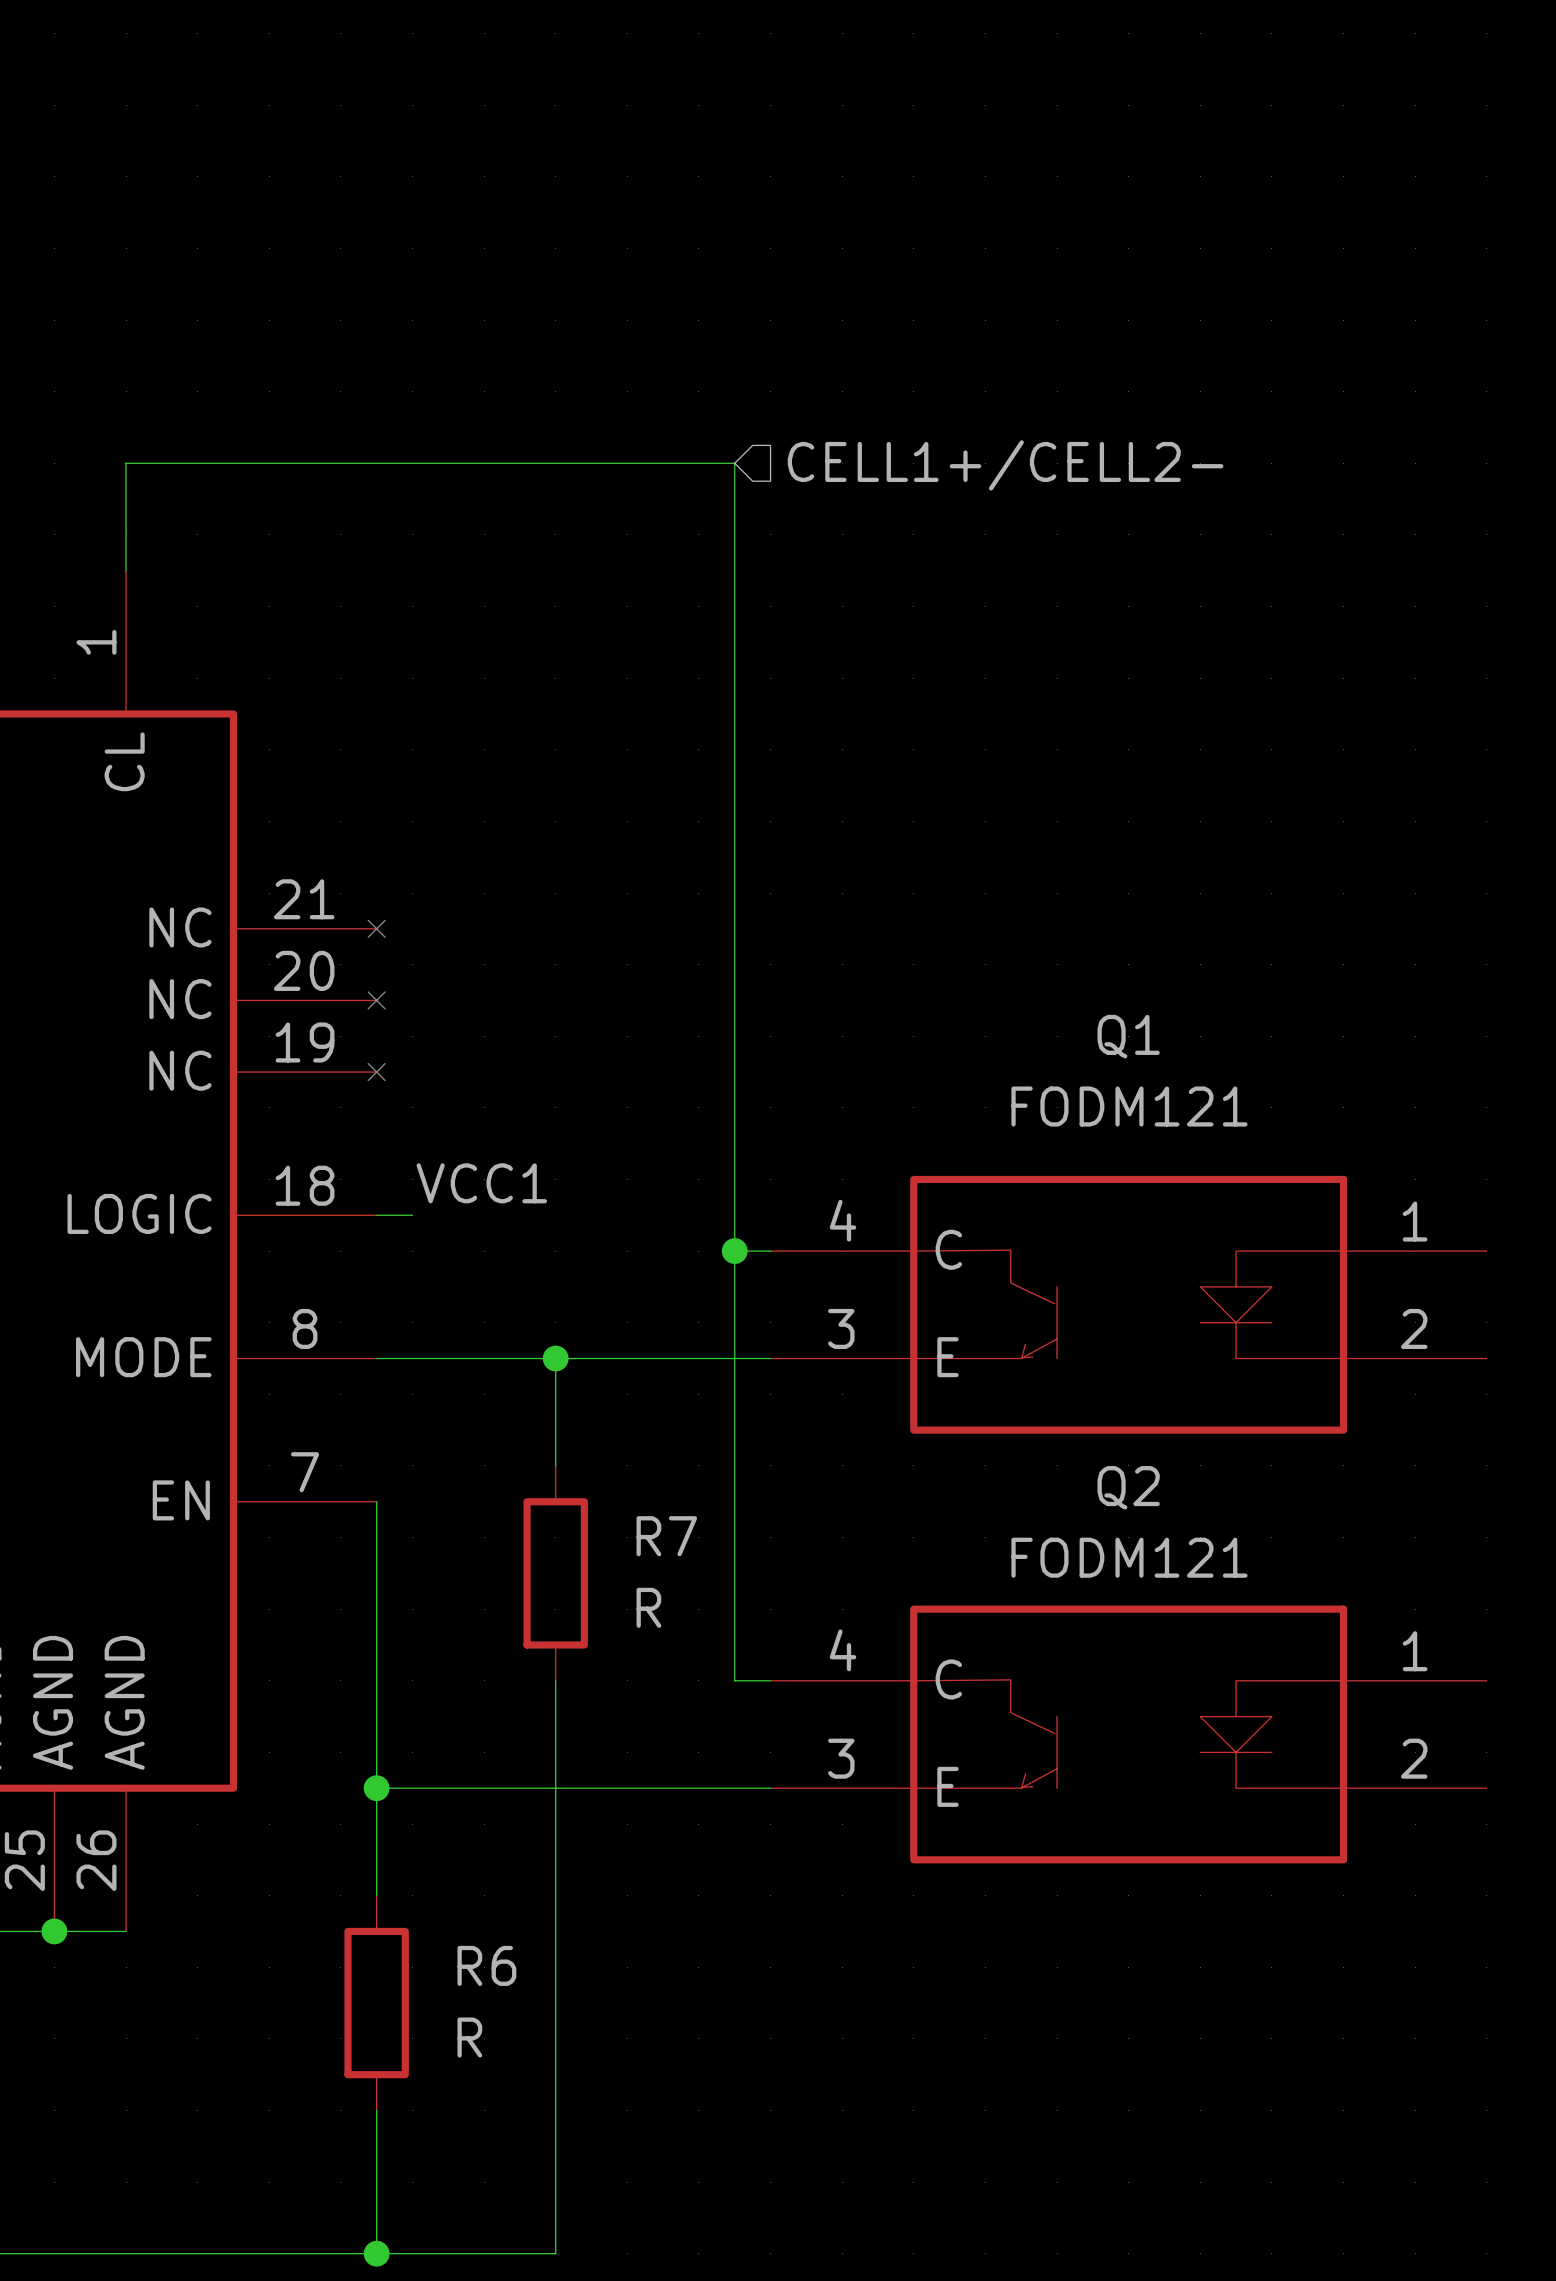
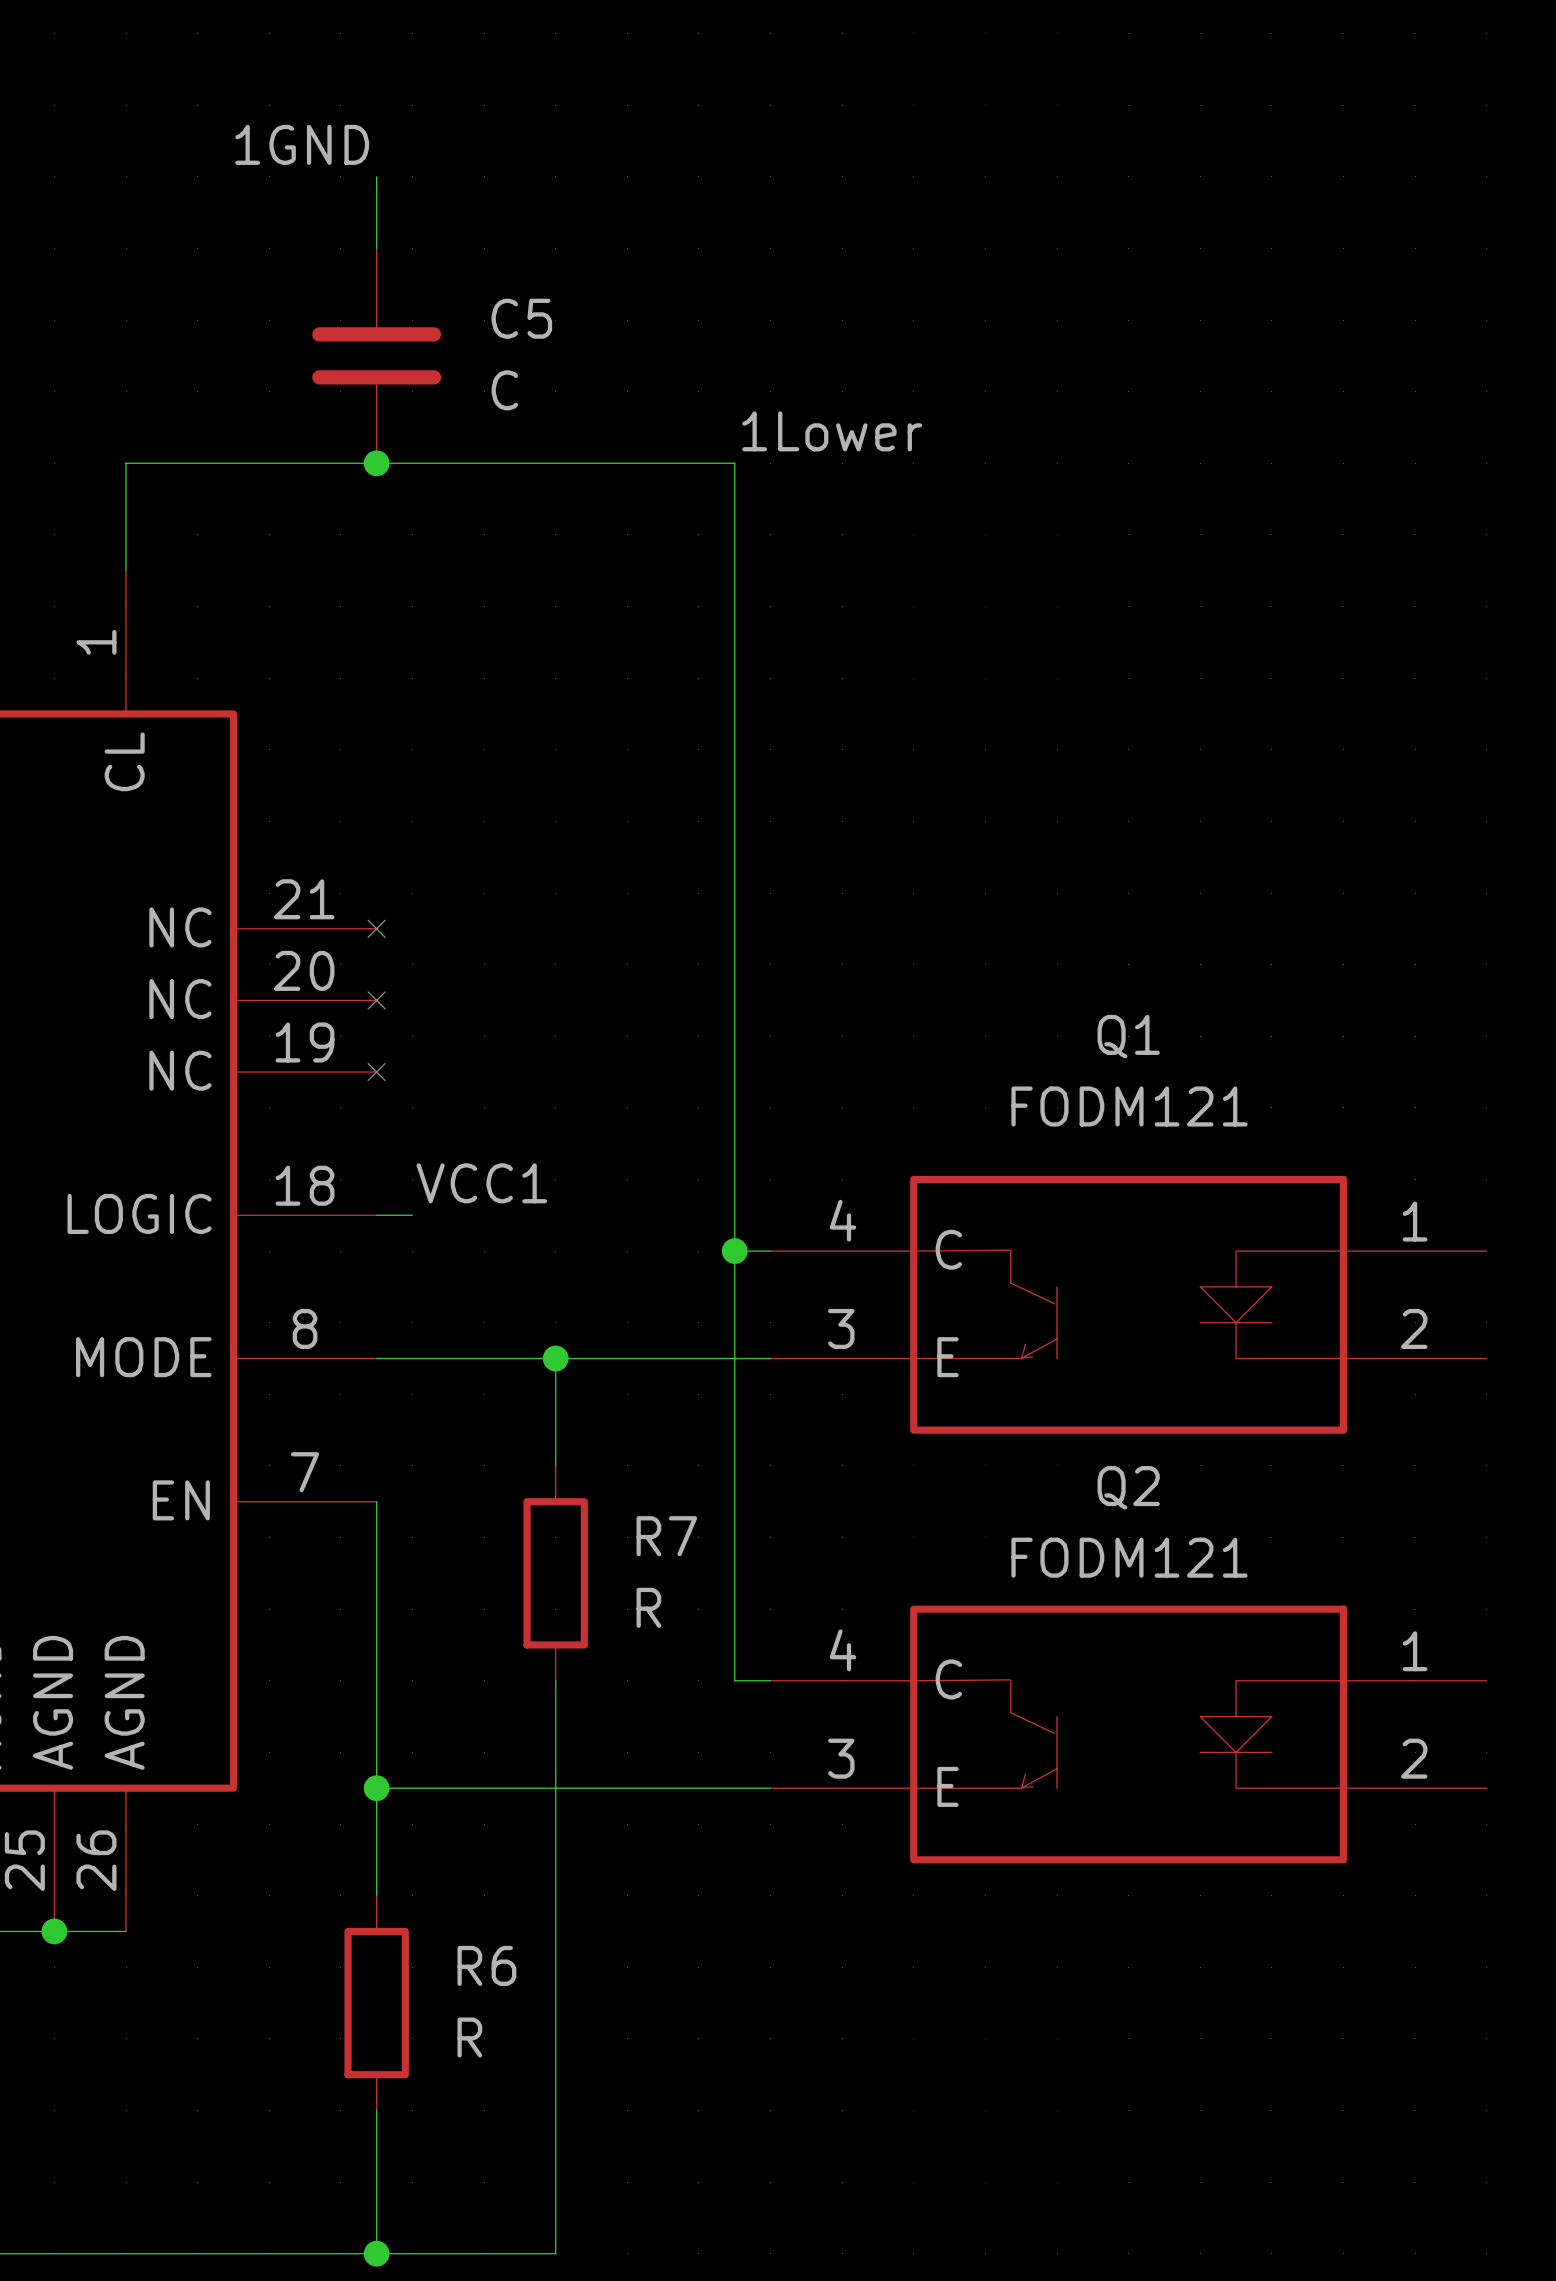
label: none -> 1GND (302, 144)
wire: none -> (376, 176) (376, 248)
C5: none -> C (376, 355)
label: none -> 1Lower (832, 431)
junction: none -> (376, 463)
hierarchical label: CELL1+/CELL2- (1005, 465) -> none

